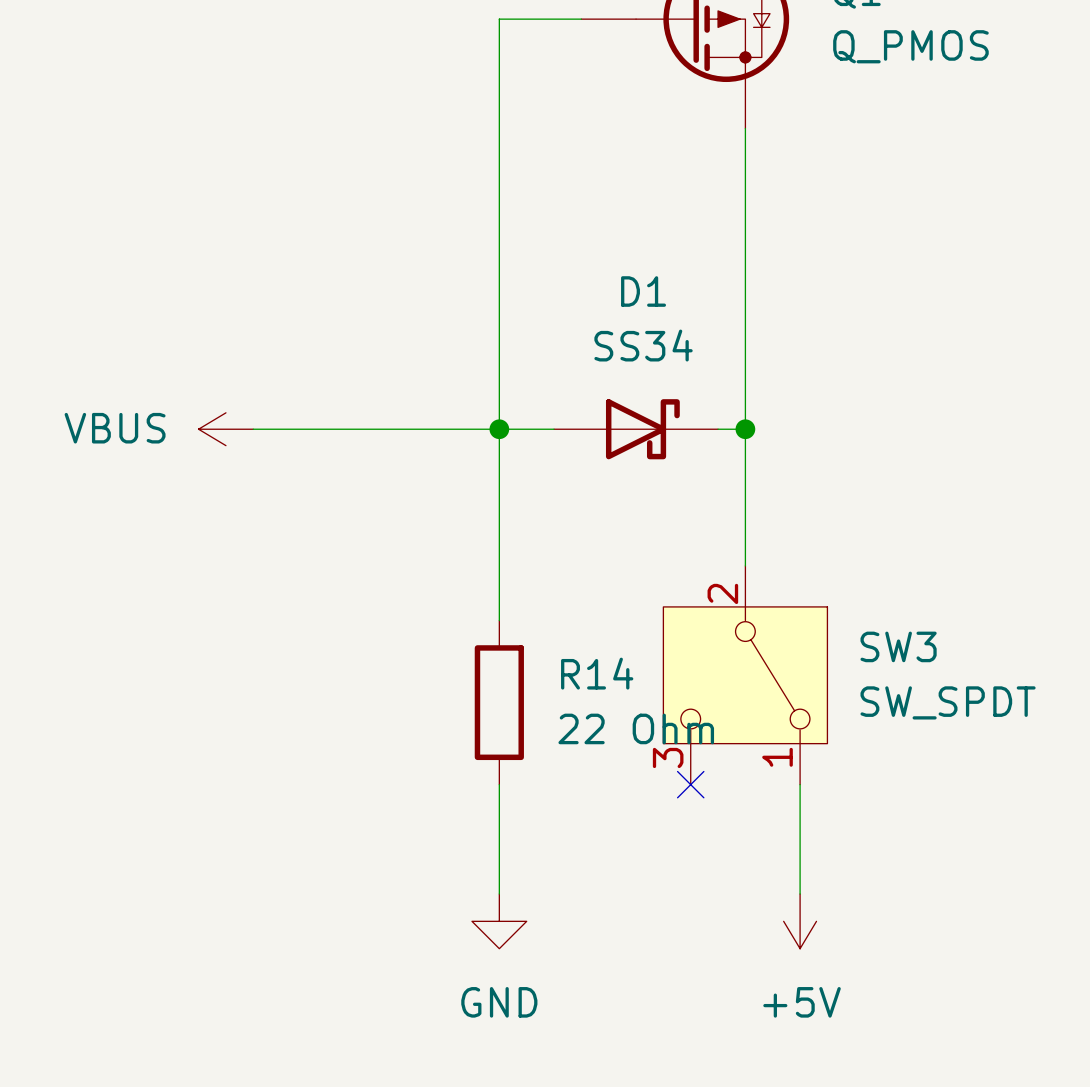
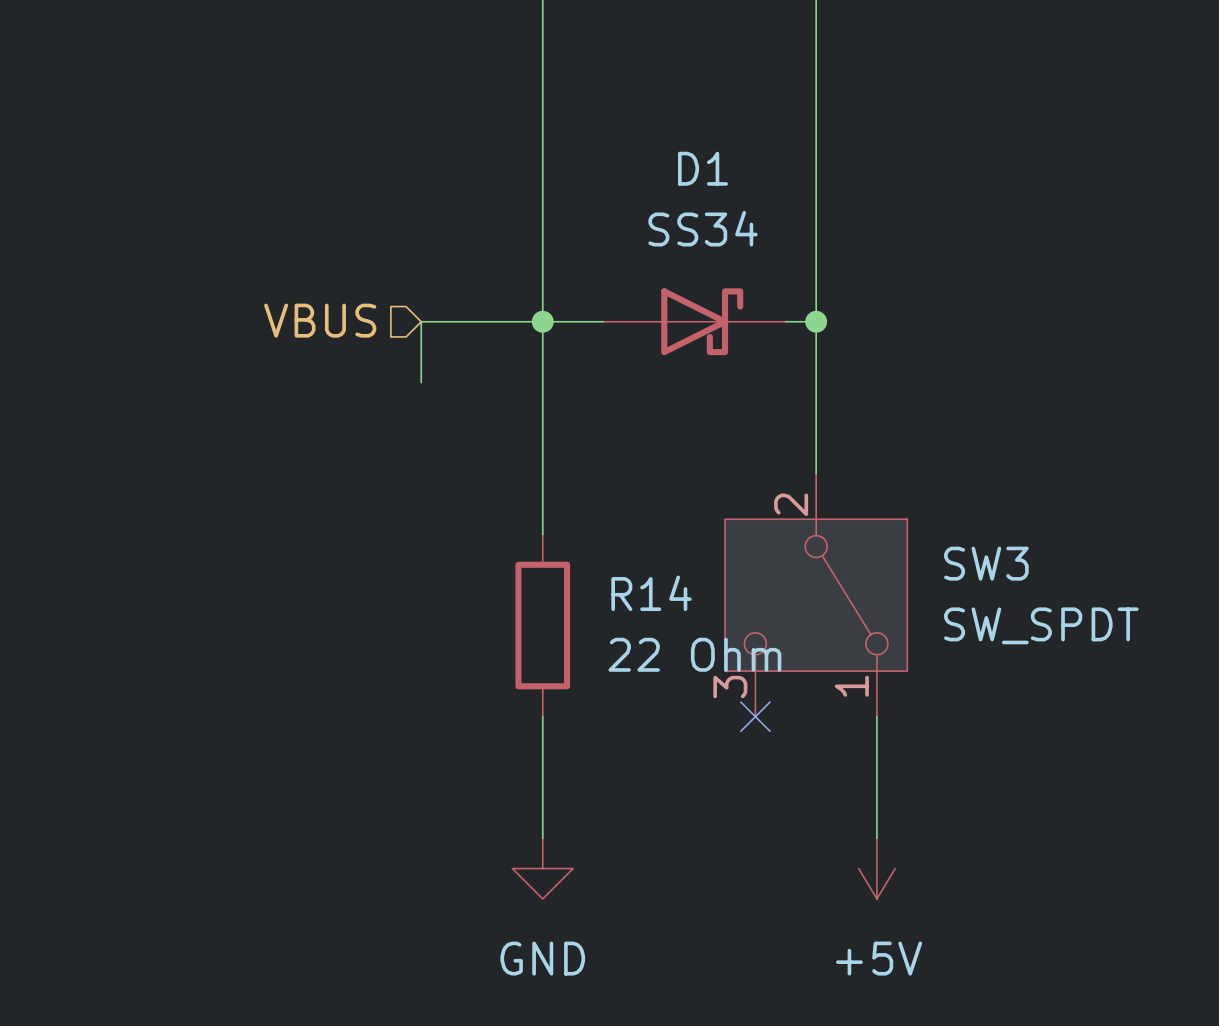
hierarchical label: none -> VBUS (320, 320)
power symbol: VBUS (225, 429) -> none
wire: (253, 429) (389, 429) -> (421, 382) (421, 321)

